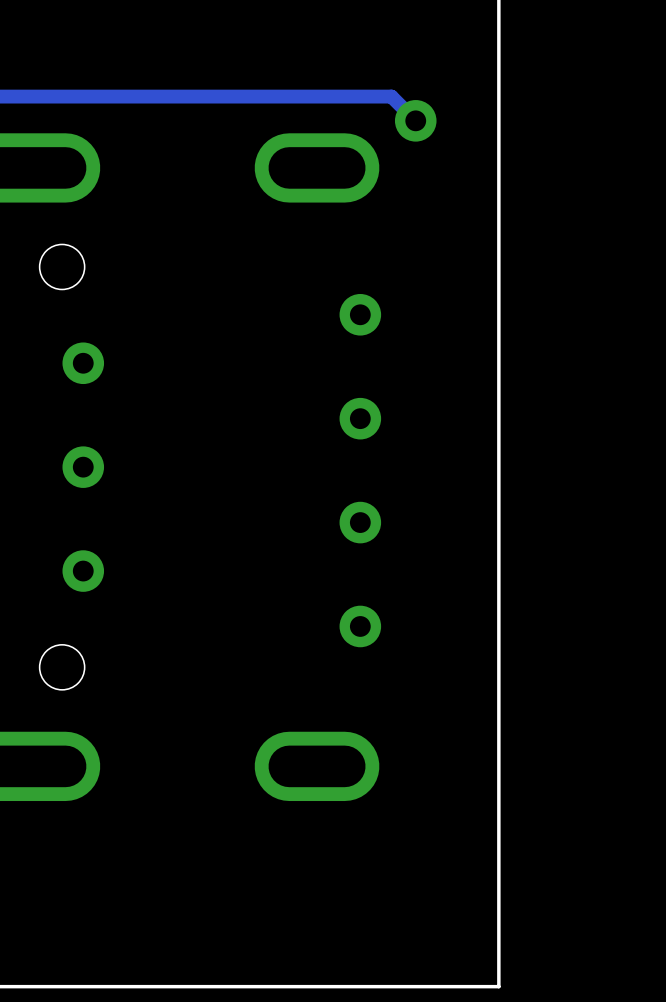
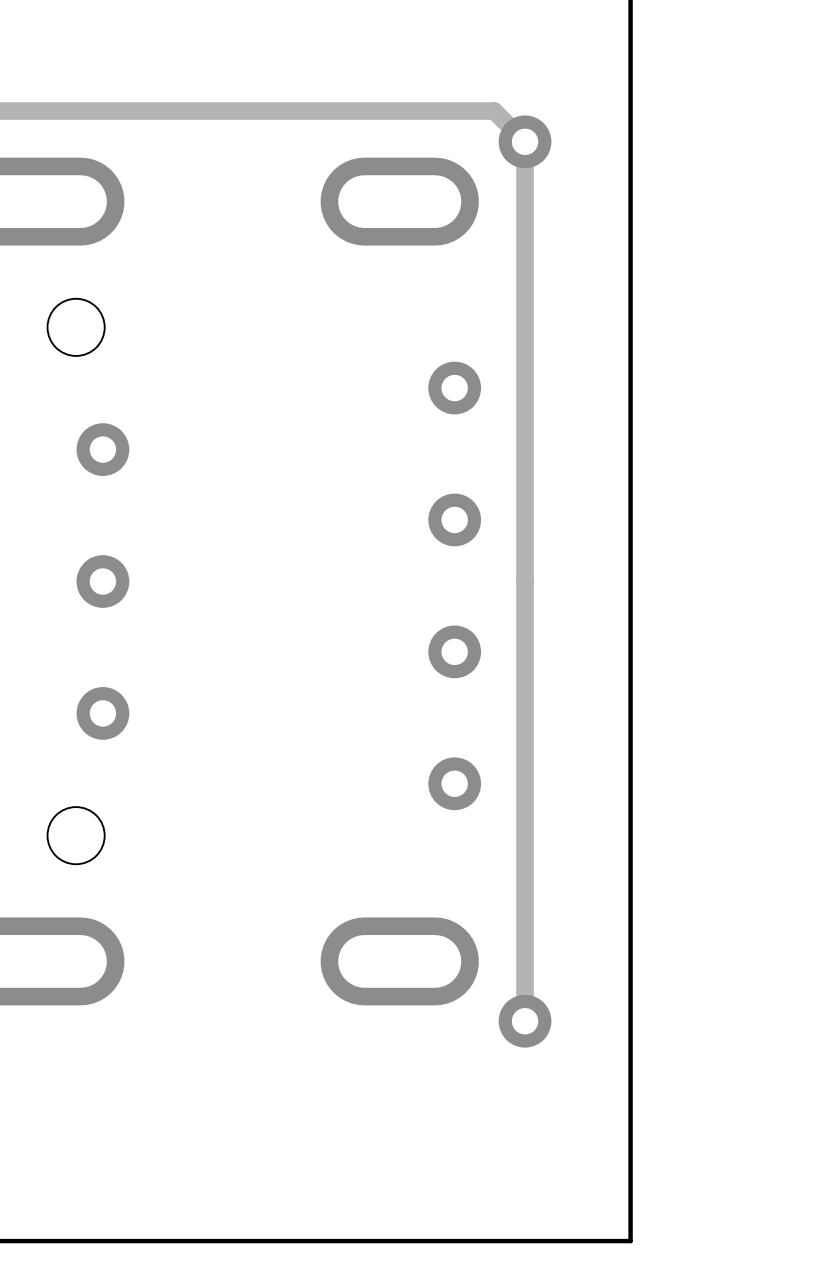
track: none -> (525, 141) (525, 1021)
via: none -> (525, 1021)

